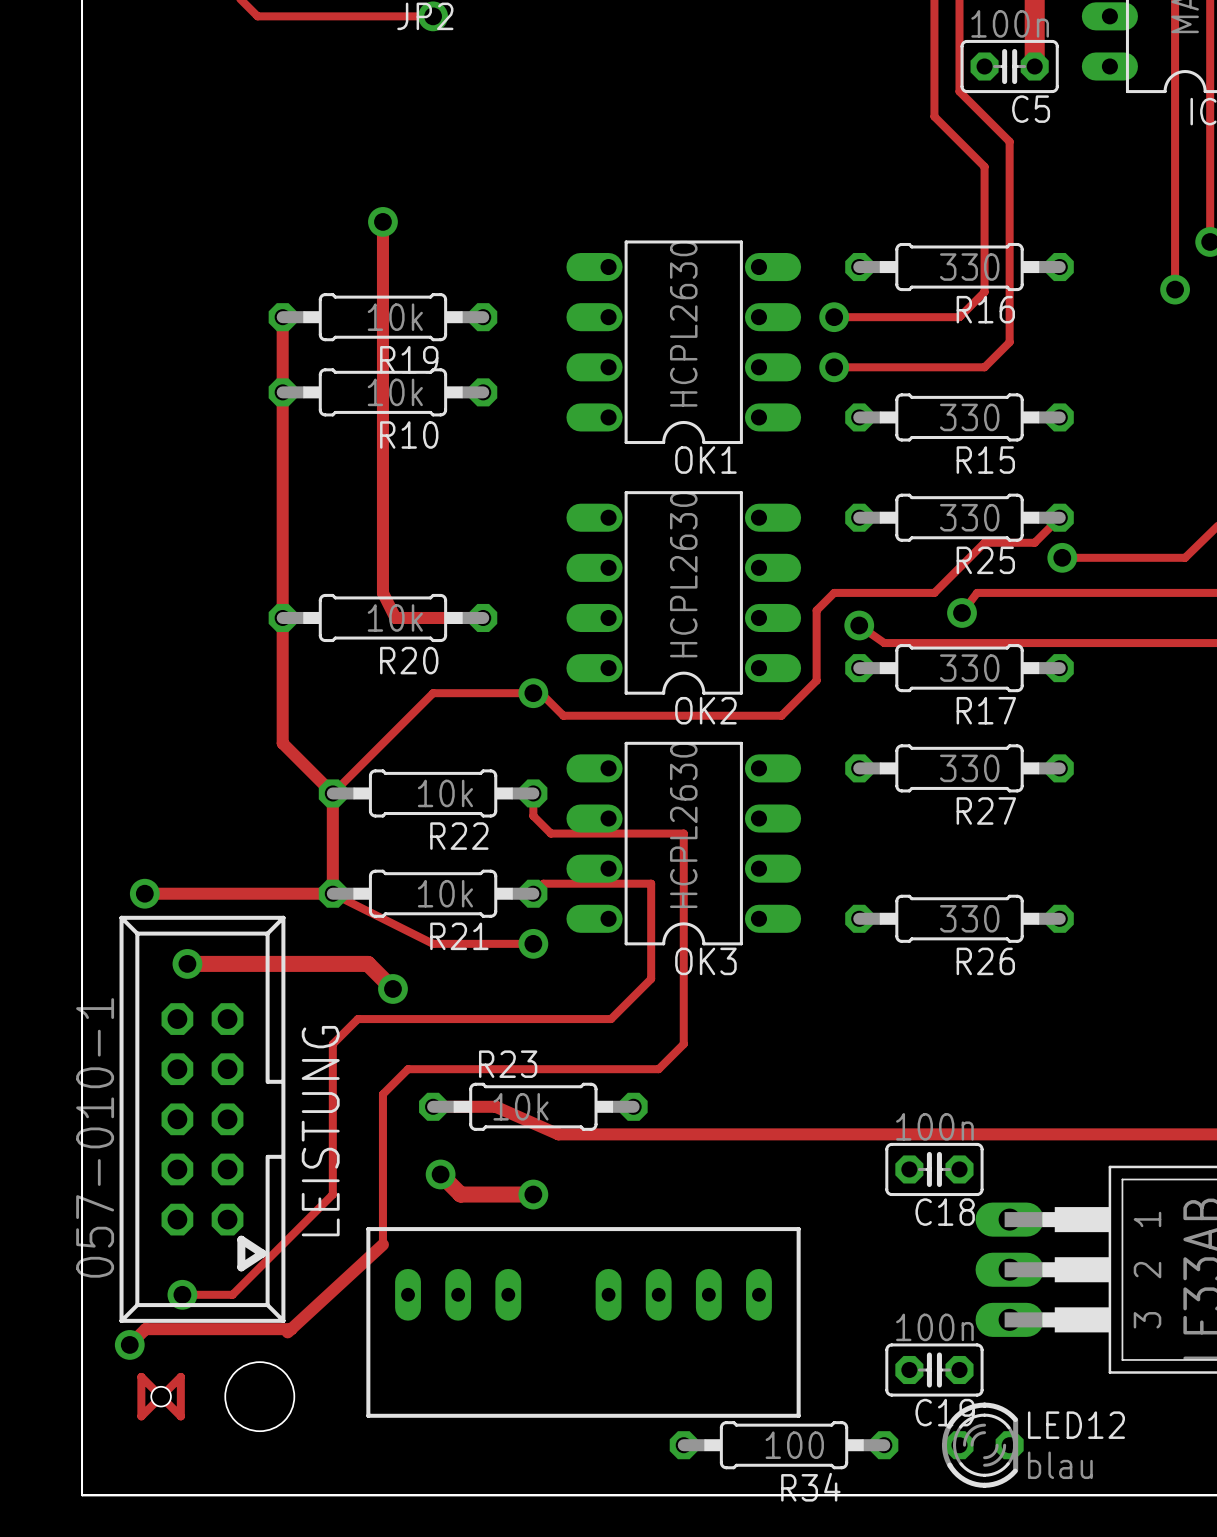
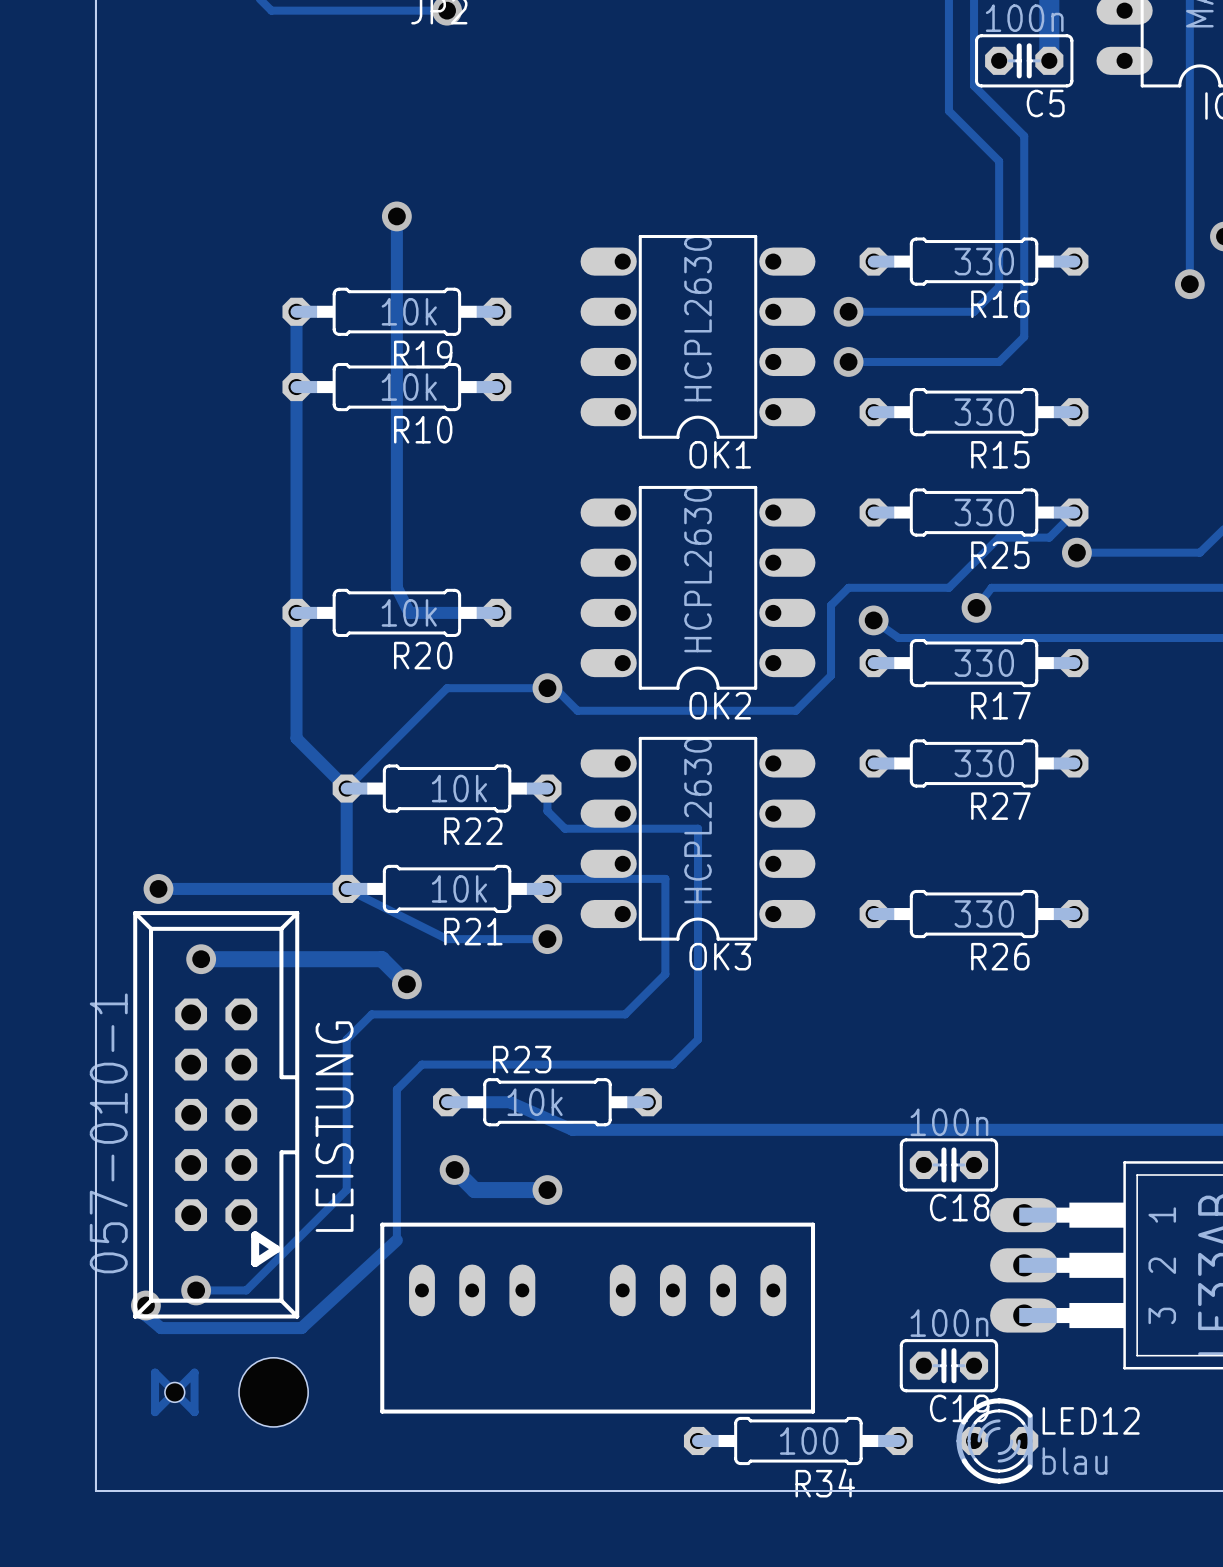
track: none -> (145, 1305) (145, 1315) (161, 1328) (301, 1328)
track: (291, 1329) (145, 1329) (129, 1344) -> none
via position: (129, 1344) -> (145, 1305)

